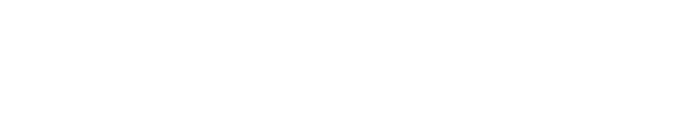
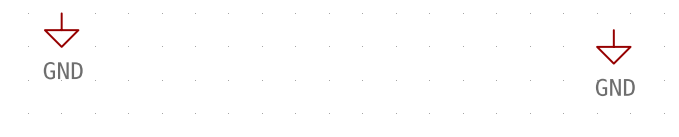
power symbol: none -> GND (61, 30)
power symbol: none -> GND (613, 46)

